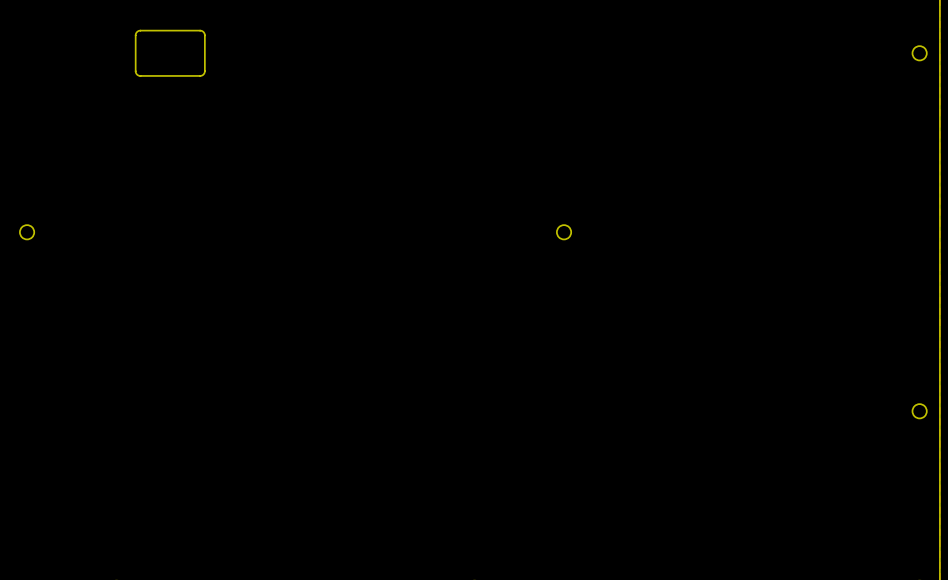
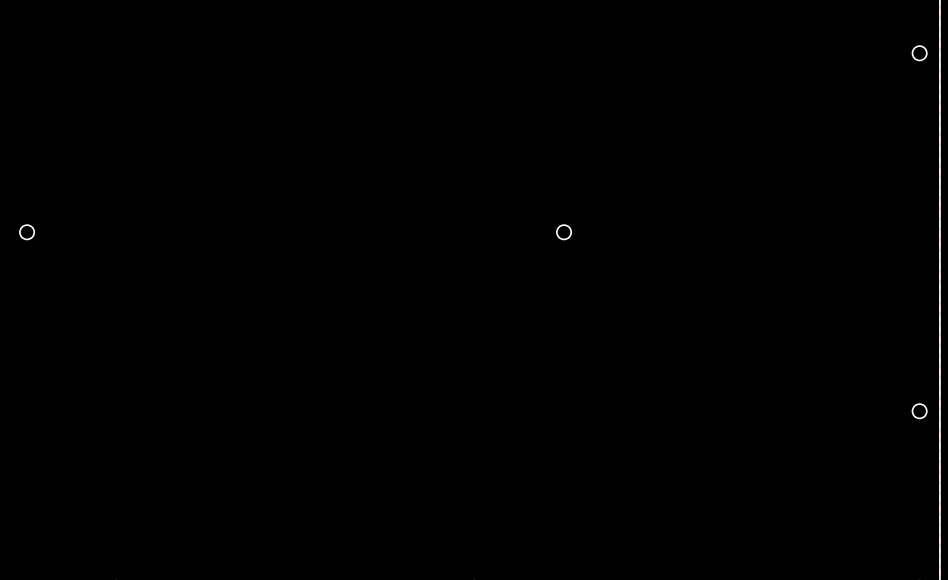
board edge: (140, 30) (203, 31) (204, 35) (203, 74) (200, 75) (137, 74) (135, 71) (135, 35) (140, 30) -> none

